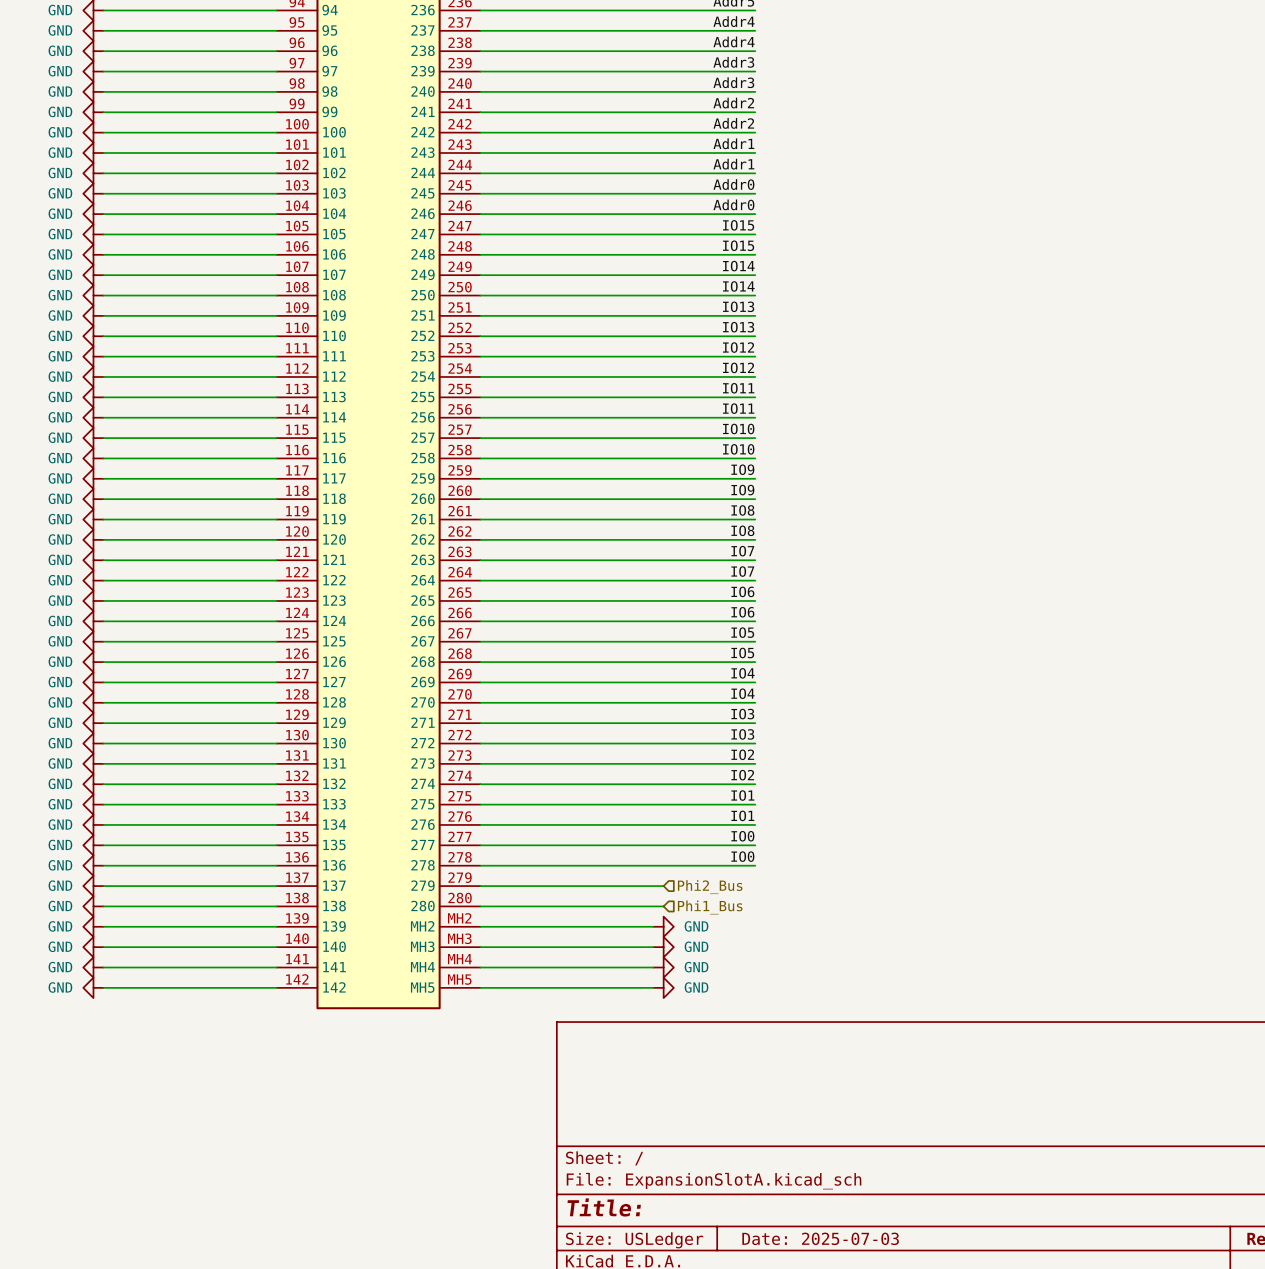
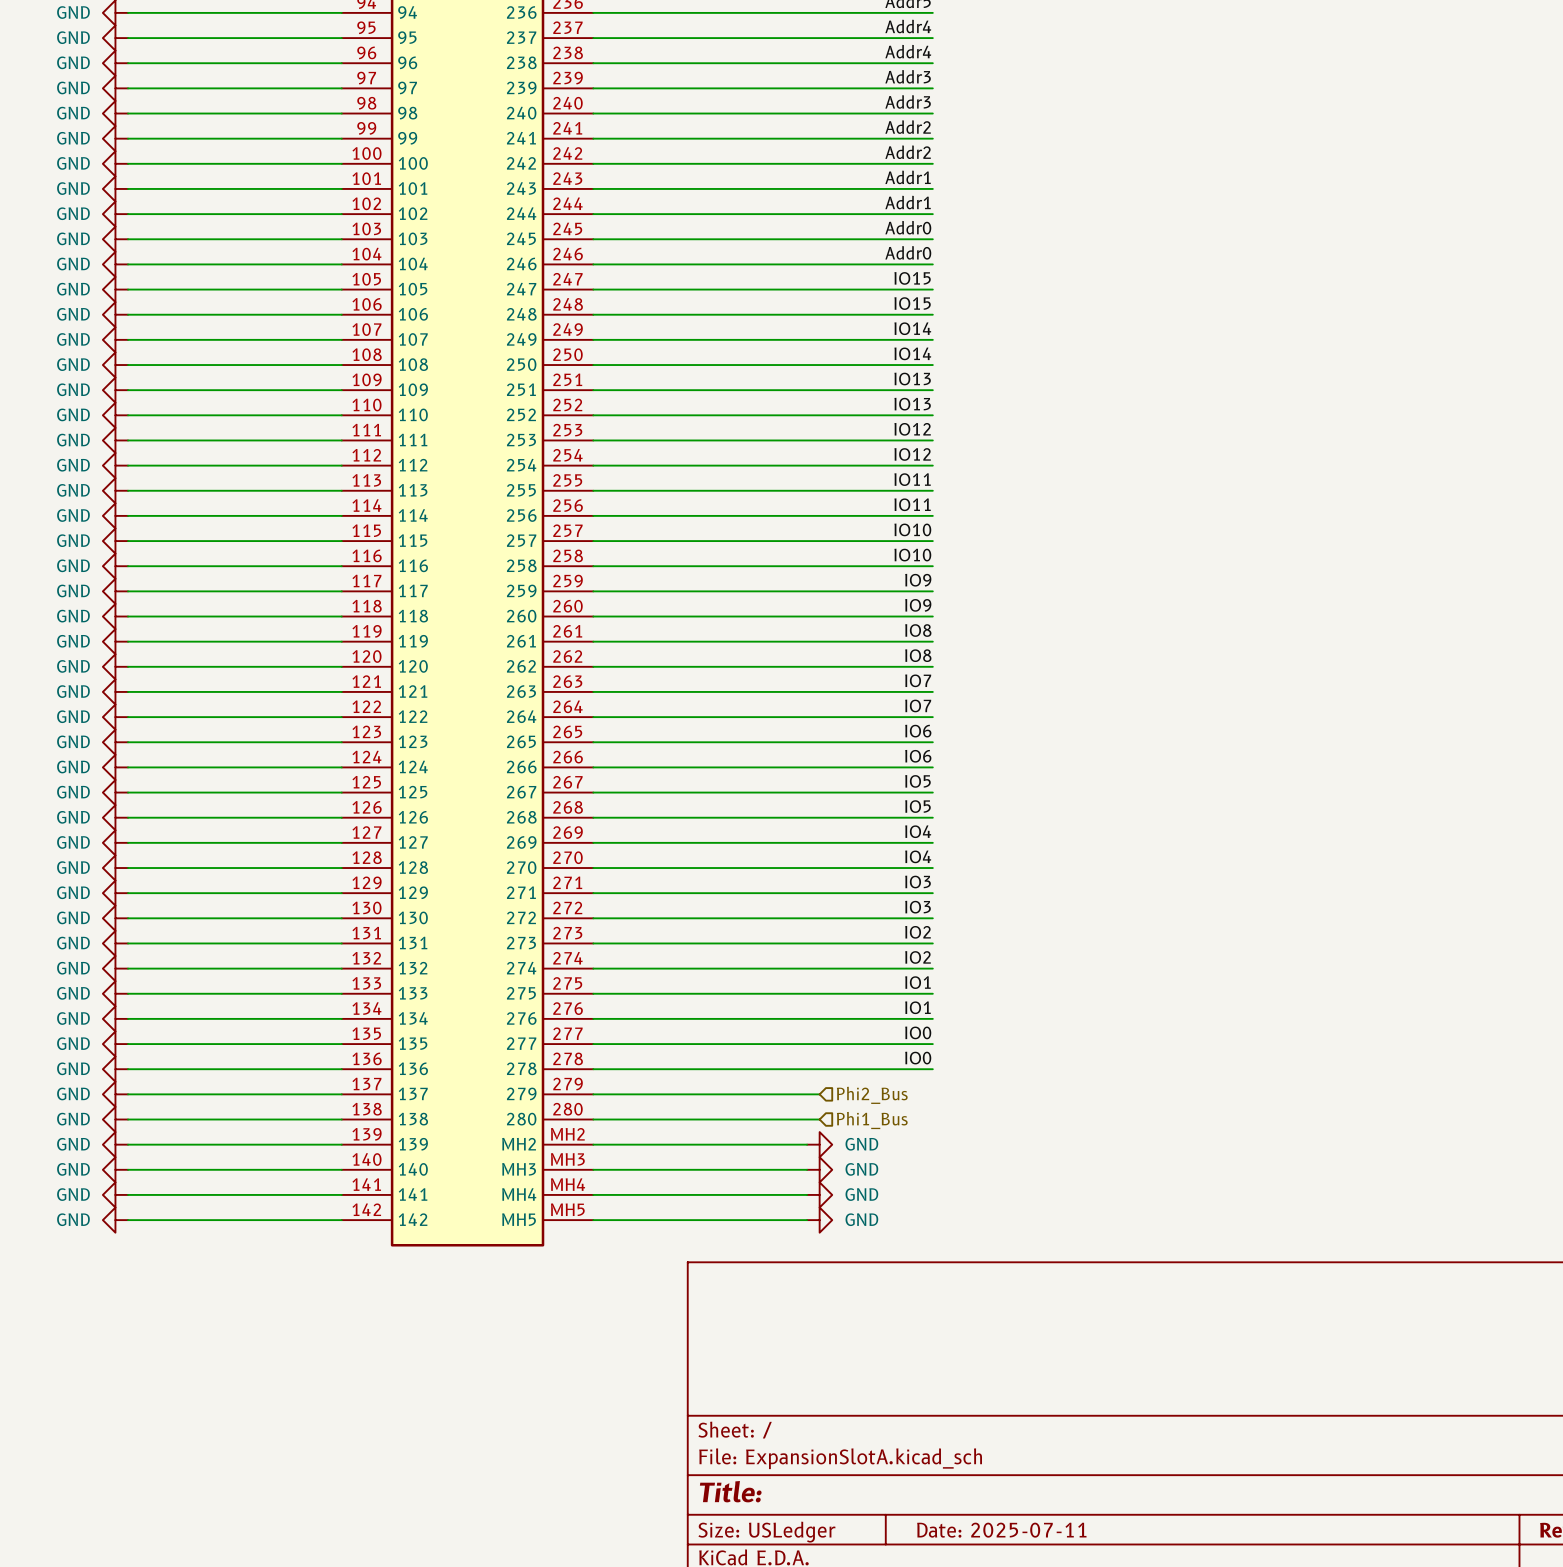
title block: Date: 2025-07-03 (820, 1238) -> Date: 2025-07-11 (1001, 1530)

